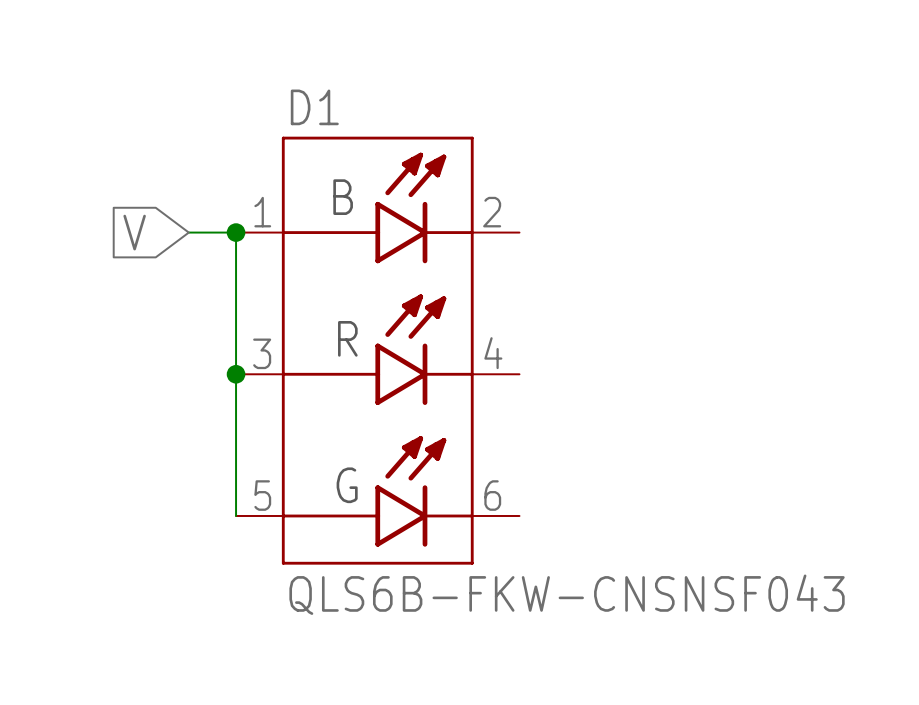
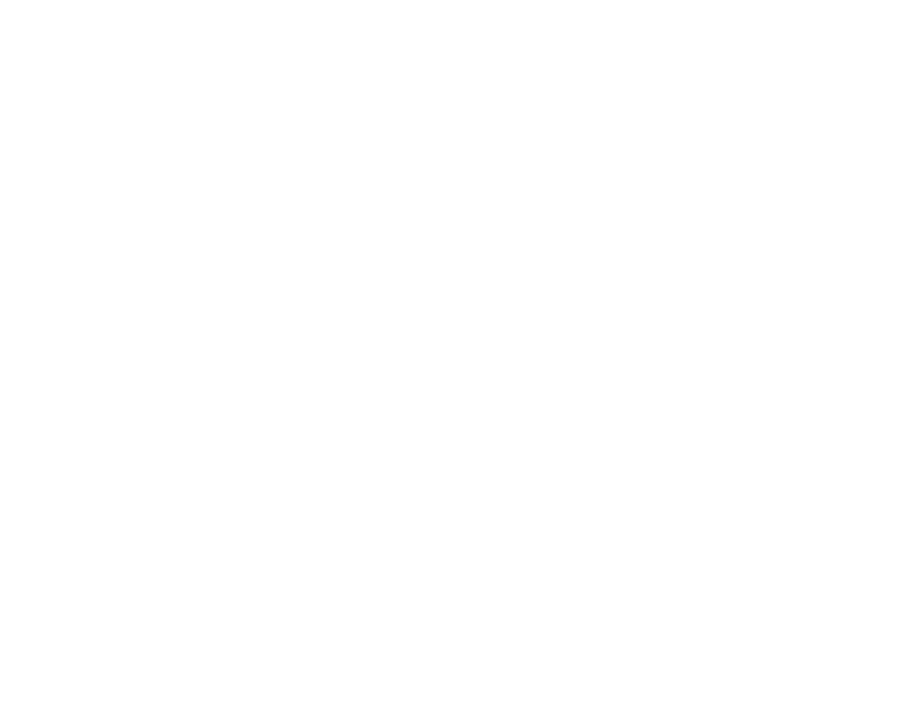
global label: V (134, 232) -> none
wire: (188, 232) (236, 232) (236, 515) -> none
junction: (236, 232) -> none
D1: QLS6B-FKW-CNSNSF043 (377, 350) -> none
junction: (236, 374) -> none

